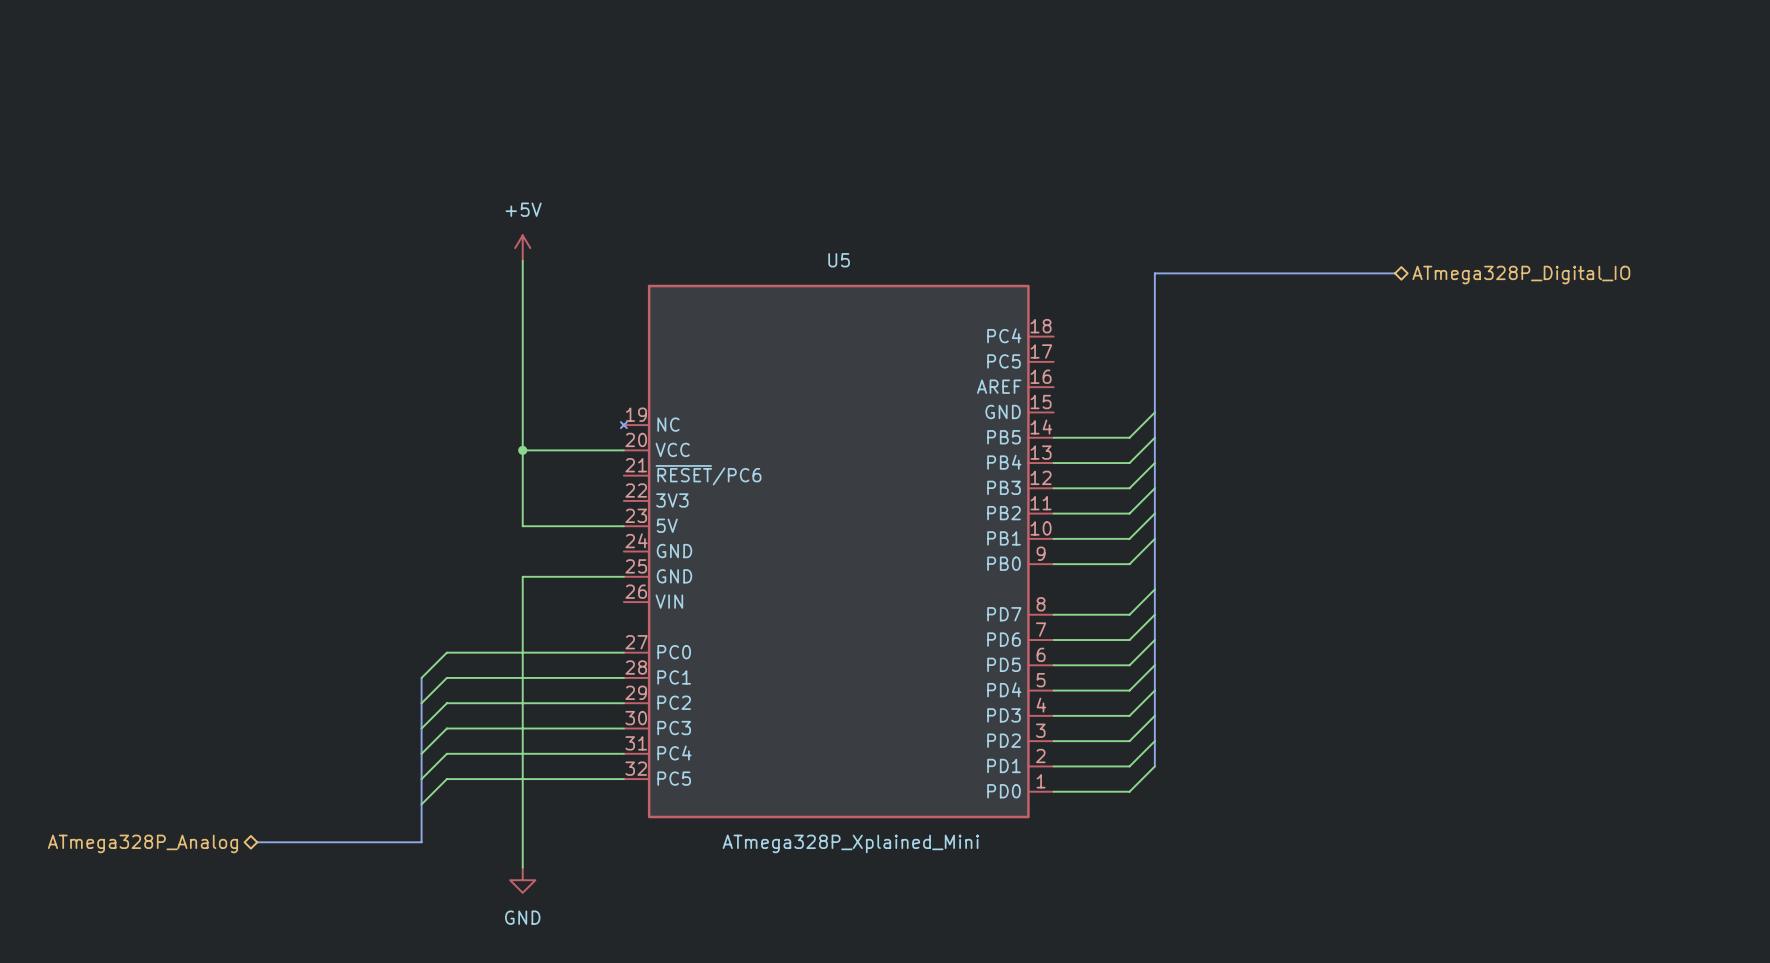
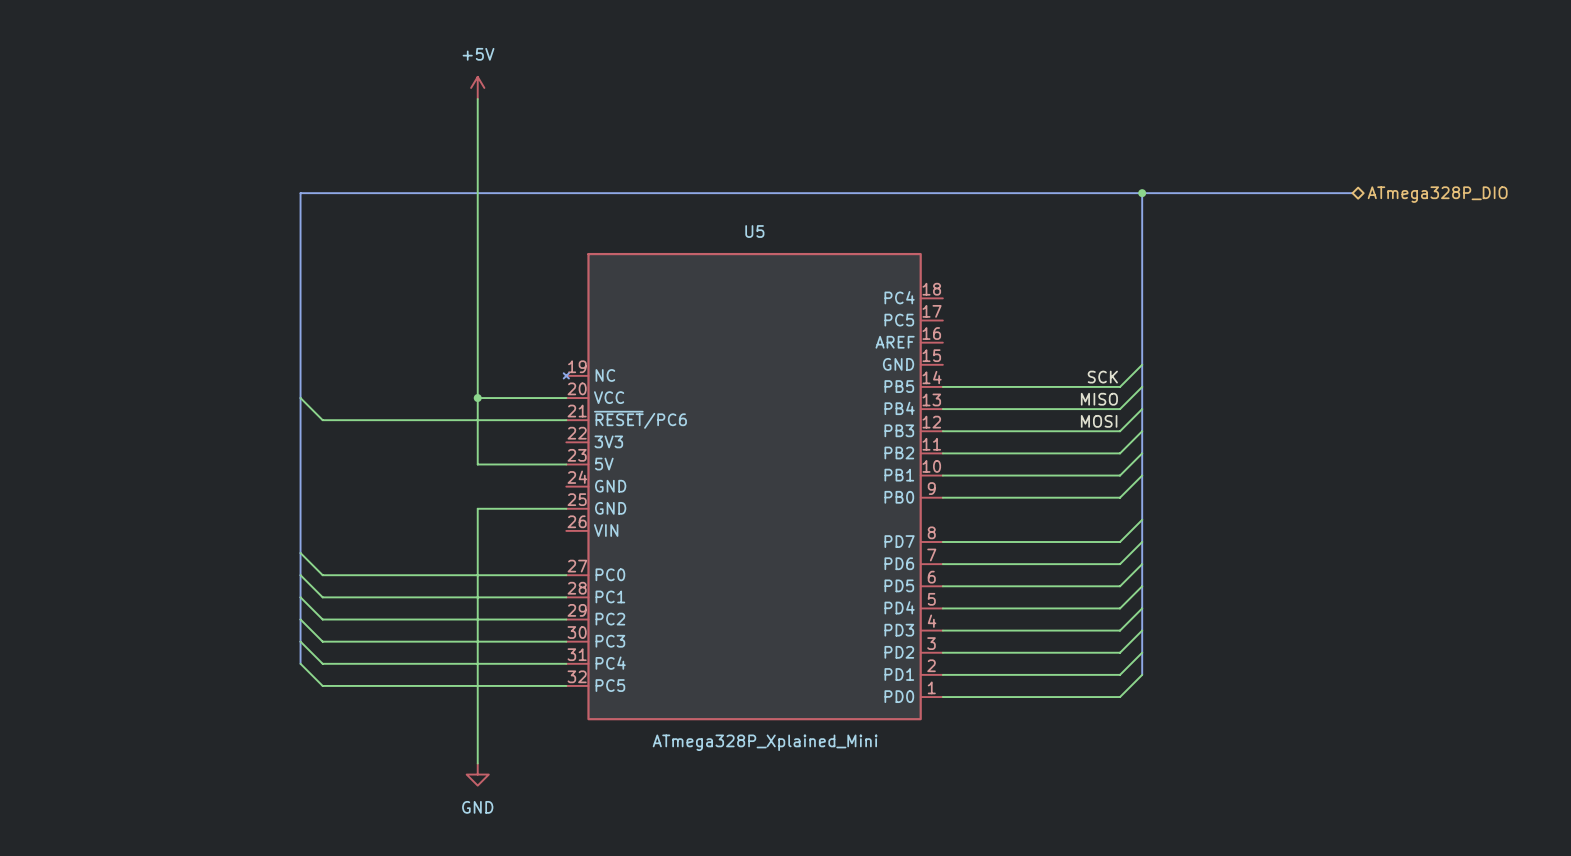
wire: none -> (477, 99) (477, 231)
bus: none -> (1142, 193) (1142, 674)
junction: none -> (1142, 193)
bus: none -> (1352, 193) (300, 193) (300, 663)
hierarchical label: none -> ATmega328P_DIO (1437, 194)
power symbol position: +5V (522, 248) -> +5V (477, 87)
bus: (1395, 273) (1154, 273) (1154, 766) -> none
hierarchical label: ATmega328P_Digital_IO (1521, 275) -> none
wire: (1154, 412) (1129, 437) -> (1142, 364) (1120, 386) (1009, 386)
label: none -> SCK (1102, 377)
wire: (1154, 437) (1129, 463) -> (1142, 386) (1120, 409) (1009, 409)
wire: none -> (300, 398) (322, 420) (566, 420)
label: none -> MISO (1099, 399)
wire: (1154, 463) (1129, 488) -> (1142, 409) (1120, 431) (1009, 431)
label: none -> MOSI (1099, 421)
wire: (1154, 488) (1129, 513) -> (1142, 431) (1120, 453) (1009, 453)
wire: (1154, 513) (1129, 538) -> (1142, 453) (1120, 475) (1009, 475)
wire: (1154, 538) (1129, 564) -> (1142, 475) (1120, 497) (1009, 497)
wire: (1154, 589) (1129, 614) -> (1142, 519) (1120, 541) (1009, 541)
wire: (1154, 614) (1129, 640) -> (1142, 541) (1120, 564) (1009, 564)
wire: (1154, 640) (1129, 665) -> (1142, 564) (1120, 586) (1009, 586)
wire: (446, 652) (421, 677) -> (411, 575) (322, 575) (300, 553)
wire: (1154, 665) (1129, 690) -> (1142, 586) (1120, 608) (1009, 608)
bus: (421, 677) (421, 842) (257, 842) -> none
wire: (446, 677) (421, 703) -> (411, 597) (322, 597) (300, 575)
wire: (1154, 690) (1129, 715) -> (1142, 608) (1120, 630) (1009, 630)
wire: (446, 703) (421, 728) -> (411, 619) (322, 619) (300, 597)
wire: (1154, 715) (1129, 741) -> (1142, 630) (1120, 652) (1009, 652)
wire: (446, 728) (421, 753) -> (411, 641) (322, 641) (300, 619)
wire: (1154, 741) (1129, 766) -> (1142, 652) (1120, 674) (1009, 674)
wire: (446, 753) (421, 779) -> (411, 663) (322, 663) (300, 641)
wire: (1154, 766) (1129, 791) -> (1142, 674) (1120, 697) (1009, 697)
wire: (446, 779) (421, 804) -> (411, 685) (322, 685) (300, 663)
hierarchical label: ATmega328P_Analog (142, 843) -> none

